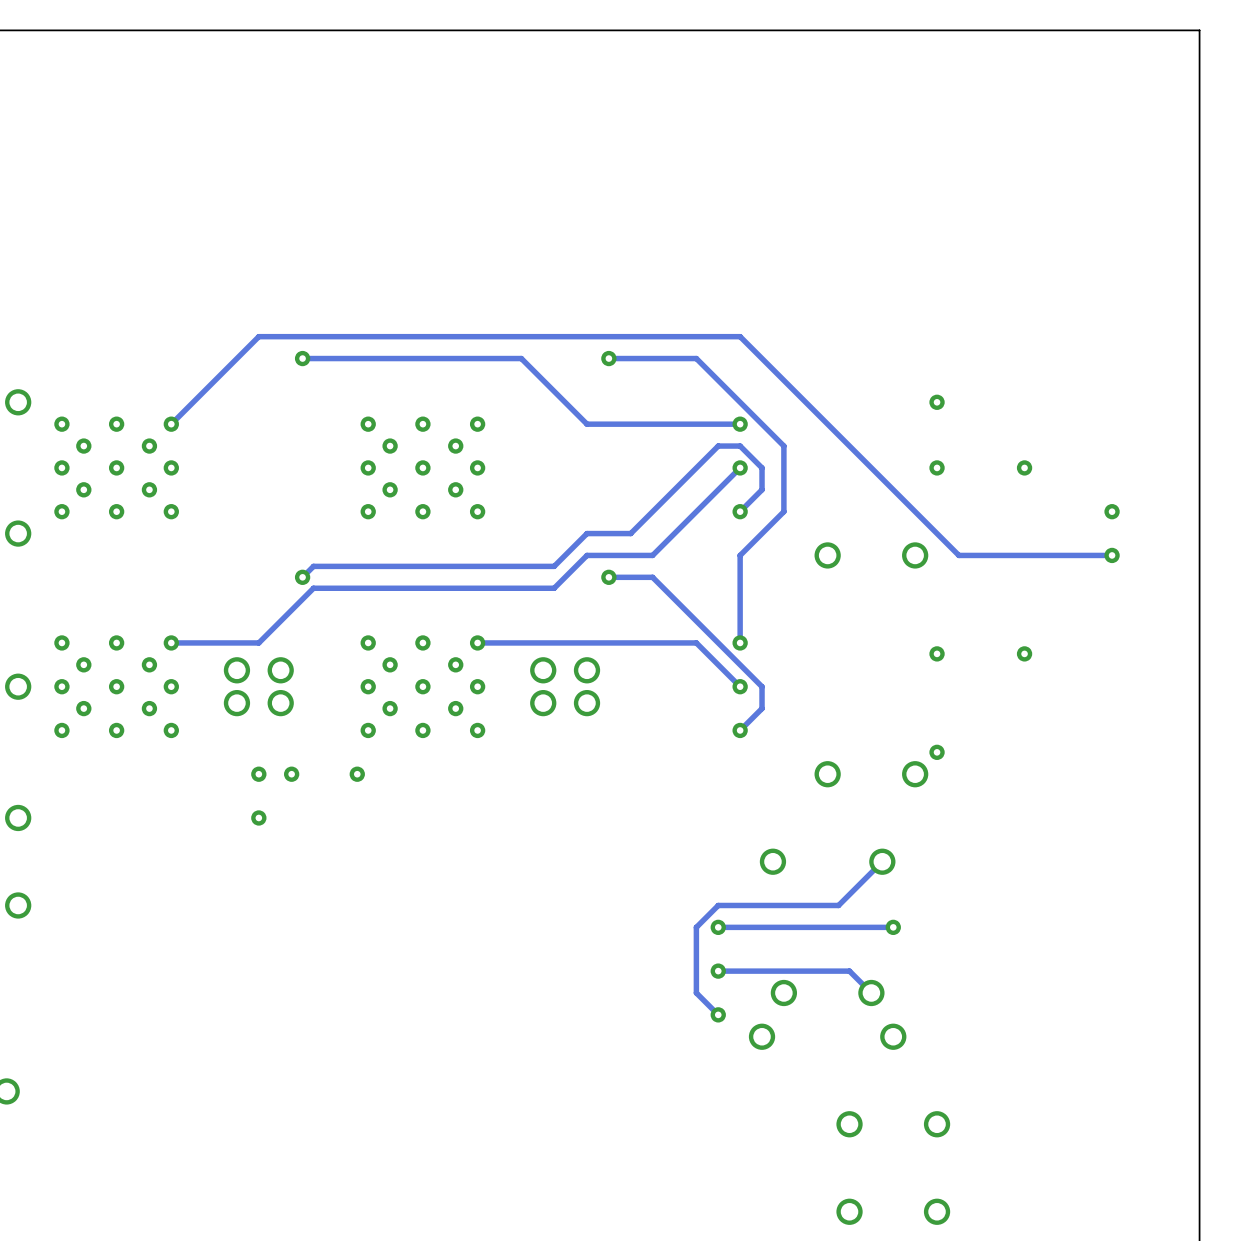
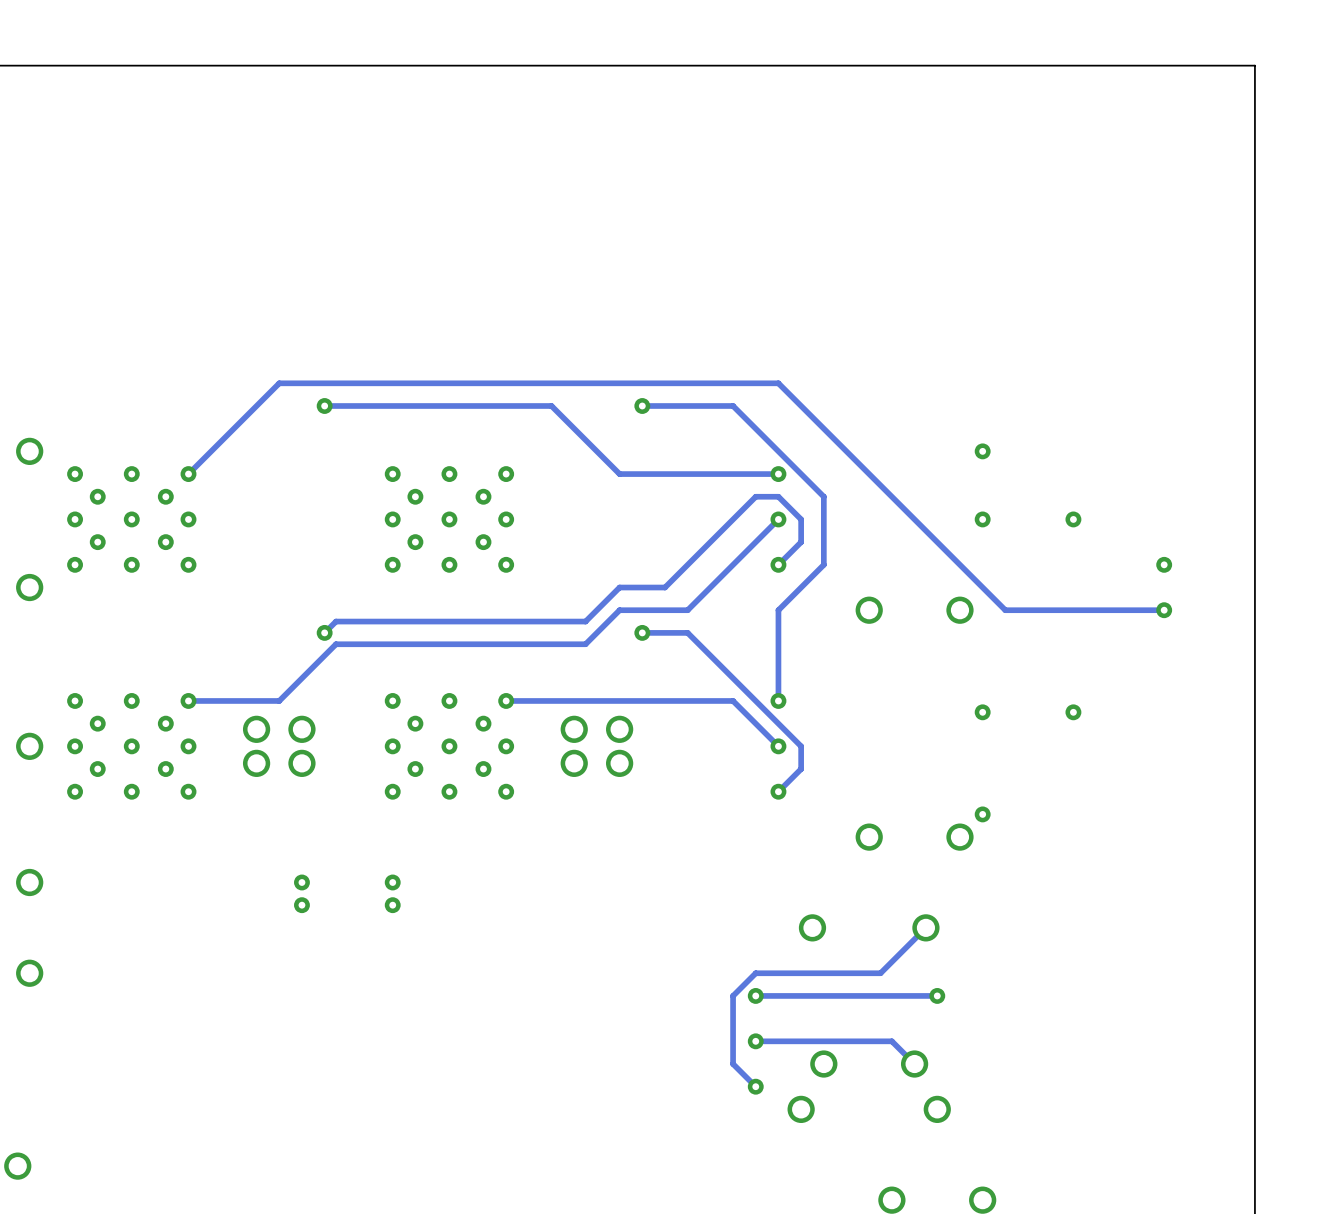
via: (258, 774) -> none
via: (291, 774) -> none
via: (357, 774) -> none
via: (258, 817) -> none
via: none -> (301, 882)
via: none -> (392, 882)
via: none -> (301, 905)
via: none -> (392, 905)

